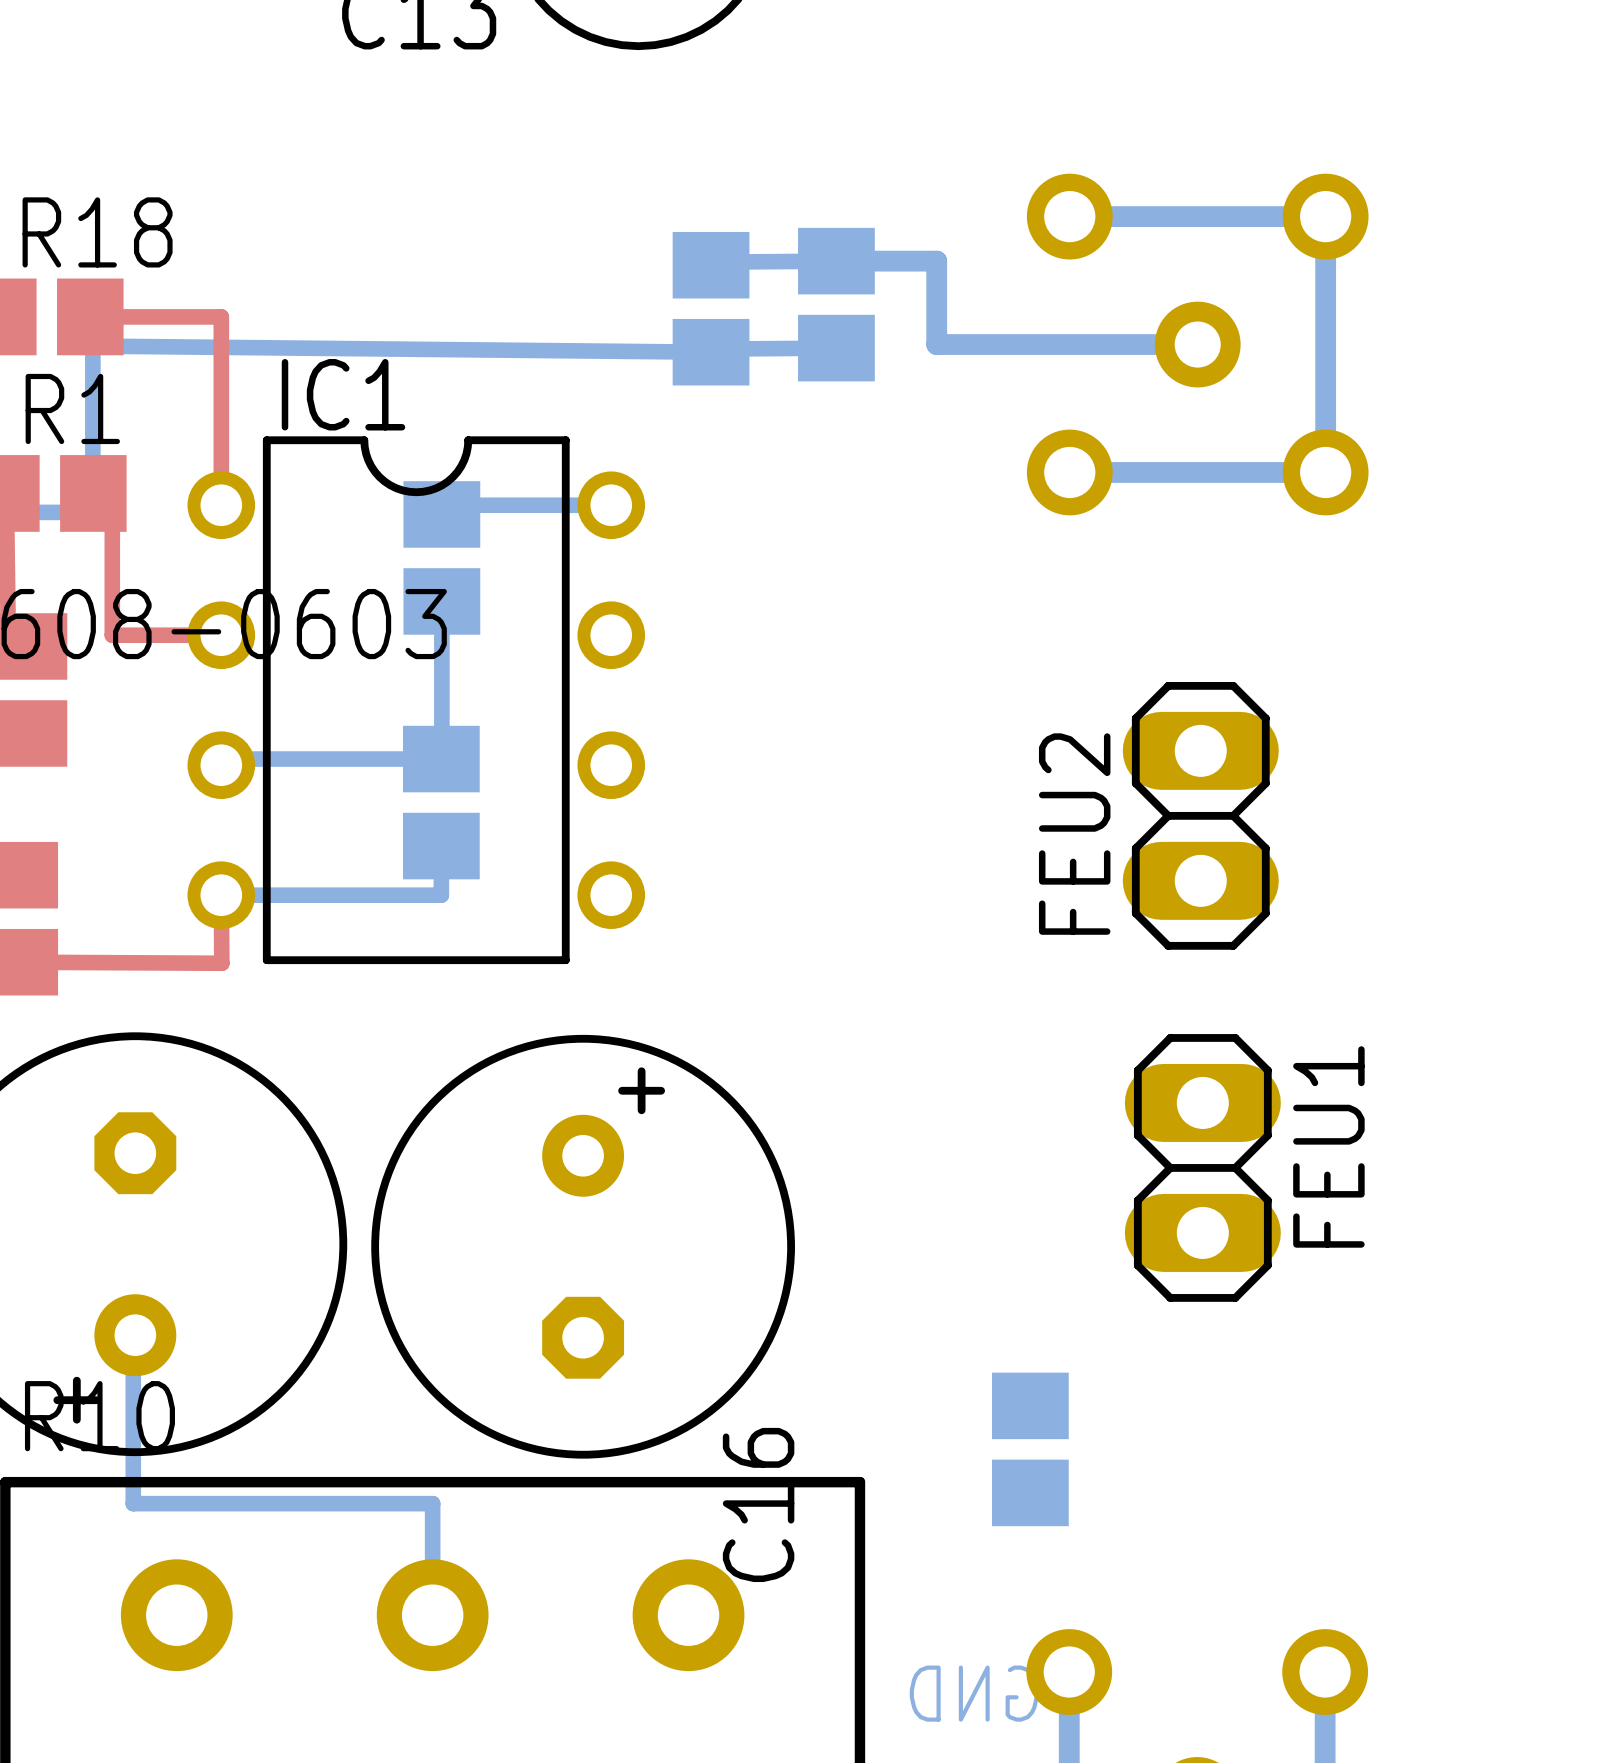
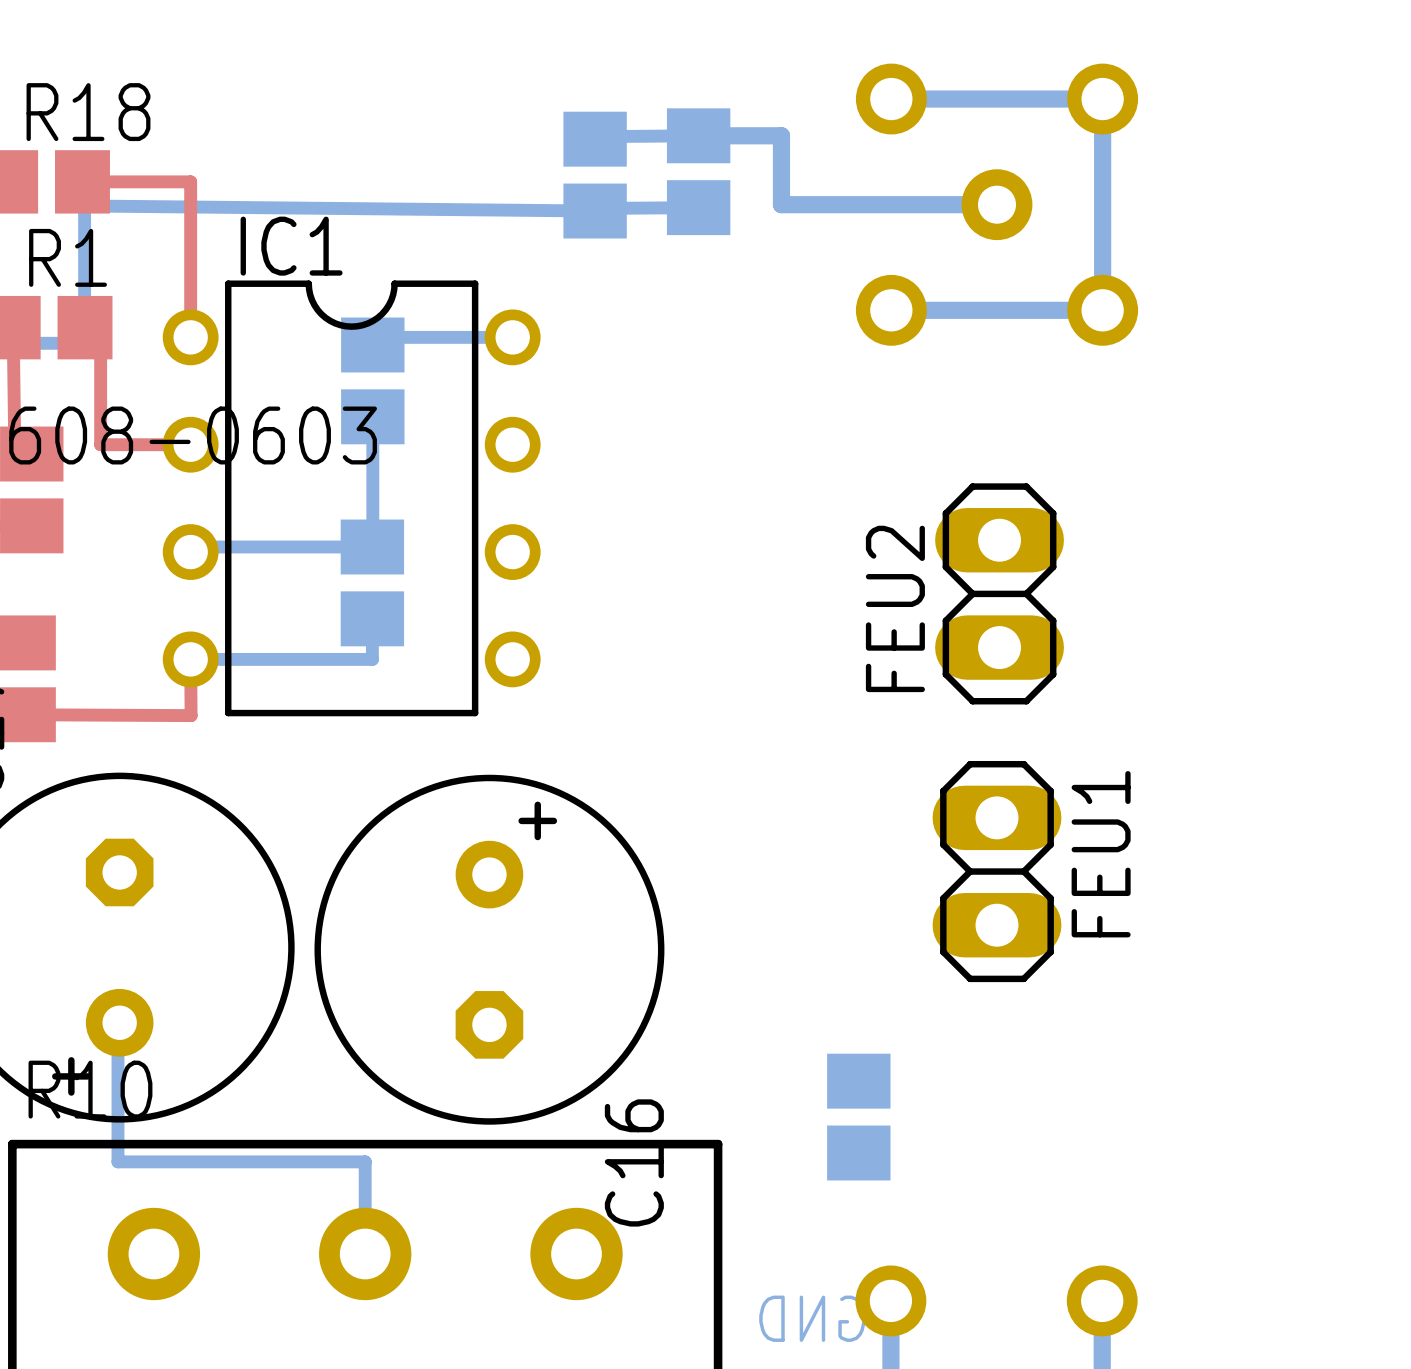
FEU1 position: (1202, 1167) -> (996, 871)

